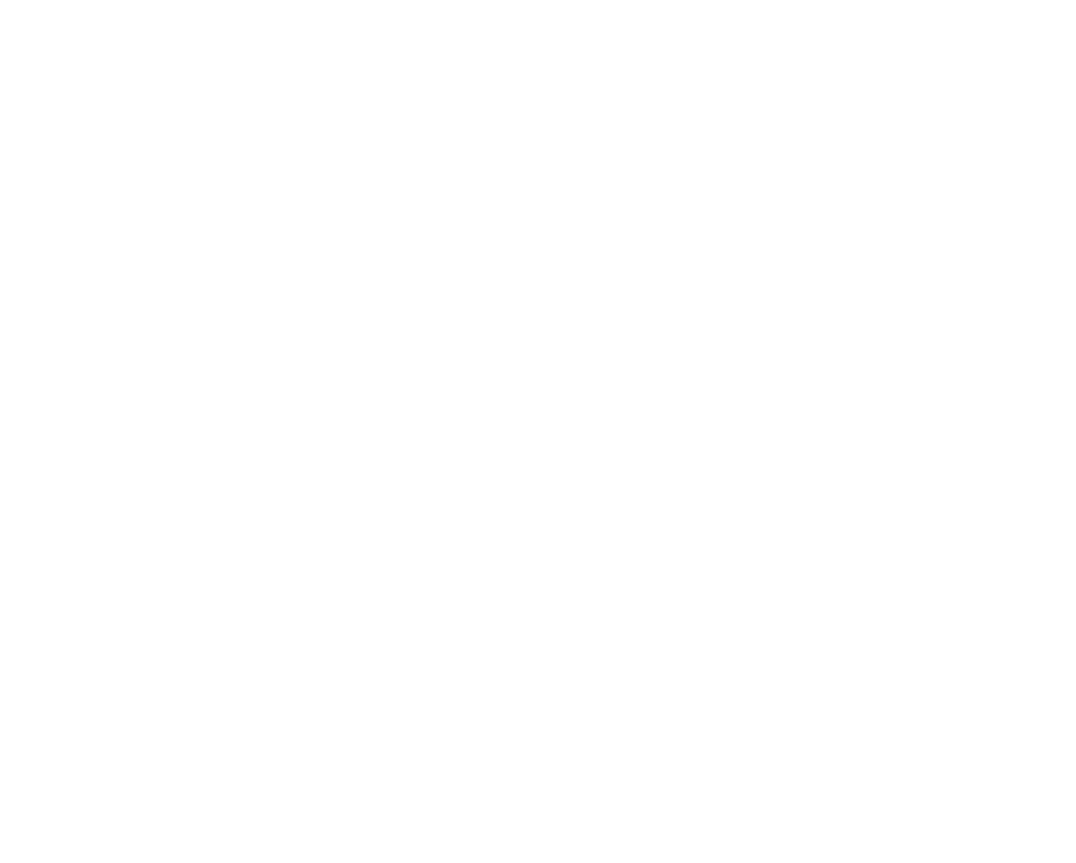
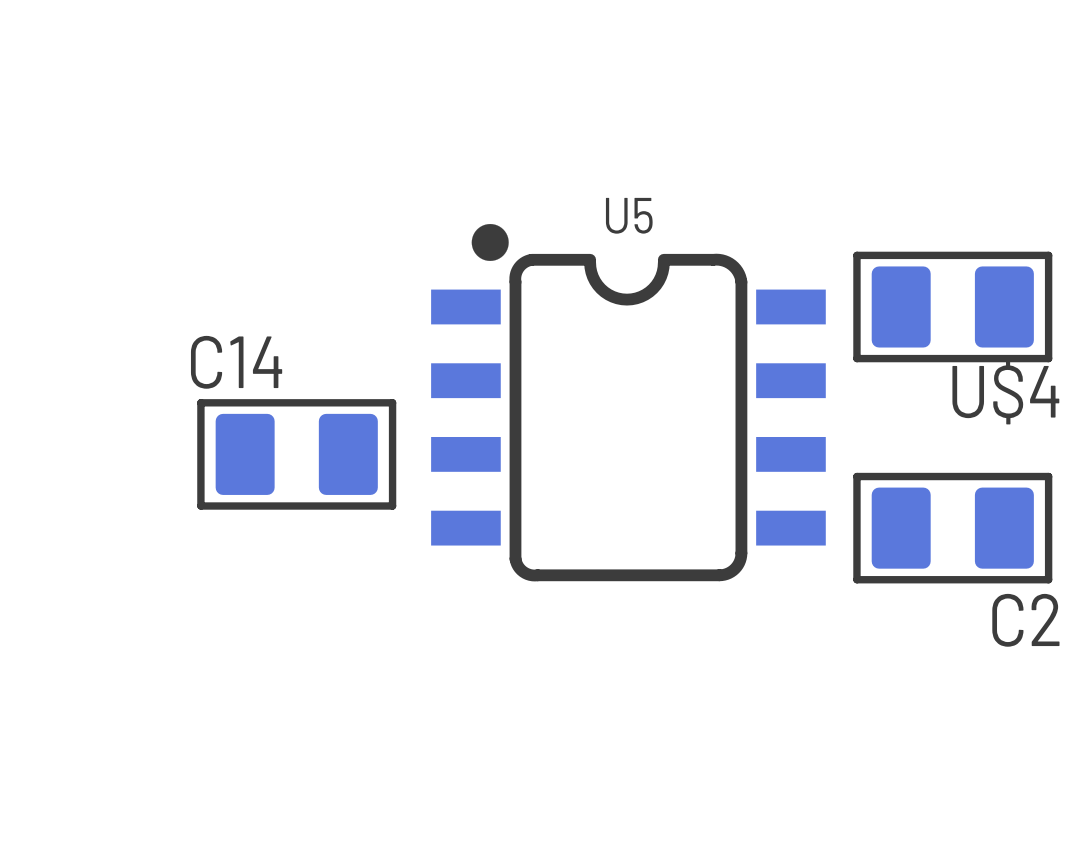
U$4: none -> (952, 306)
U5: none -> (628, 402)
C14: none -> (296, 454)
C2: none -> (952, 528)

